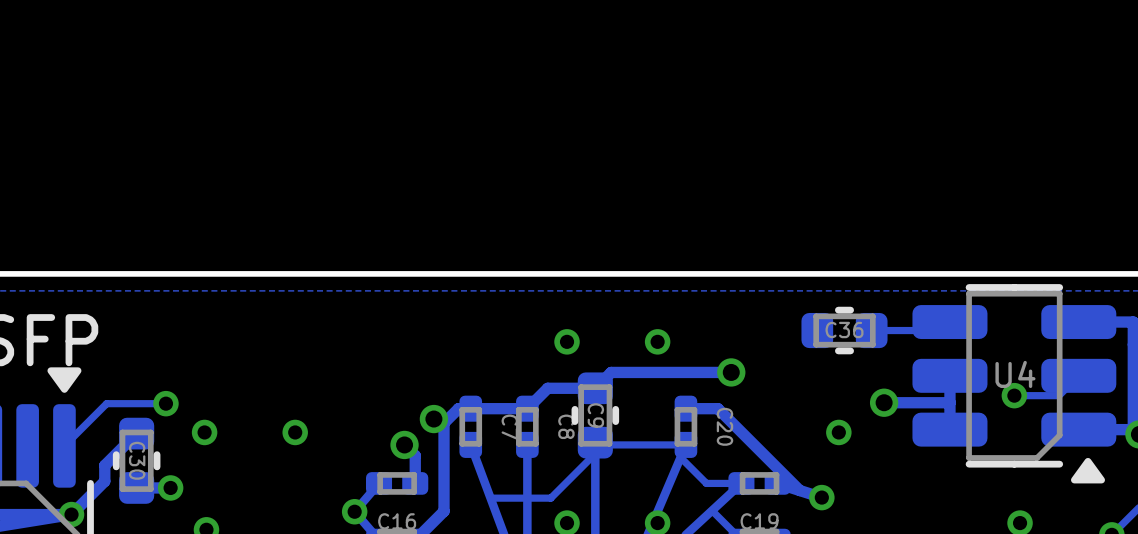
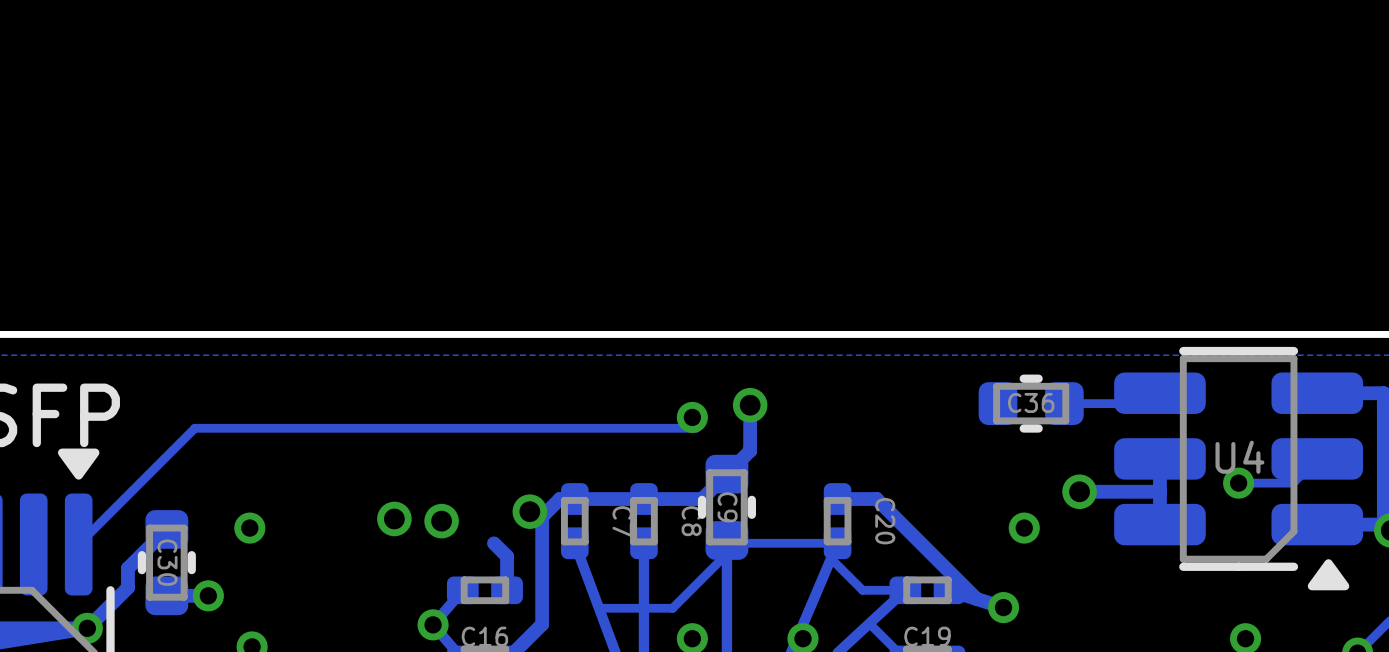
via: none -> (750, 405)
via: (657, 341) -> none
track: (731, 372) (611, 372) -> (750, 405) (750, 450) (746, 454)
via: (731, 372) -> none
track: (595, 388) (547, 388) (527, 408) -> (726, 474) (702, 499) (643, 499)
track: (165, 403) (106, 403) -> (696, 428) (194, 428) (130, 492)
via: (165, 403) -> none
via: none -> (394, 518)
via: none -> (441, 521)
via: (295, 432) -> none
via: (404, 444) -> none

